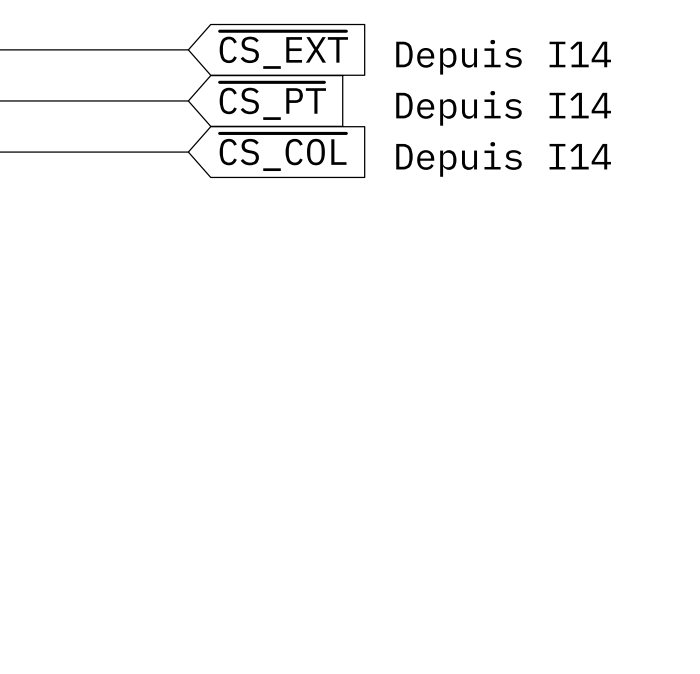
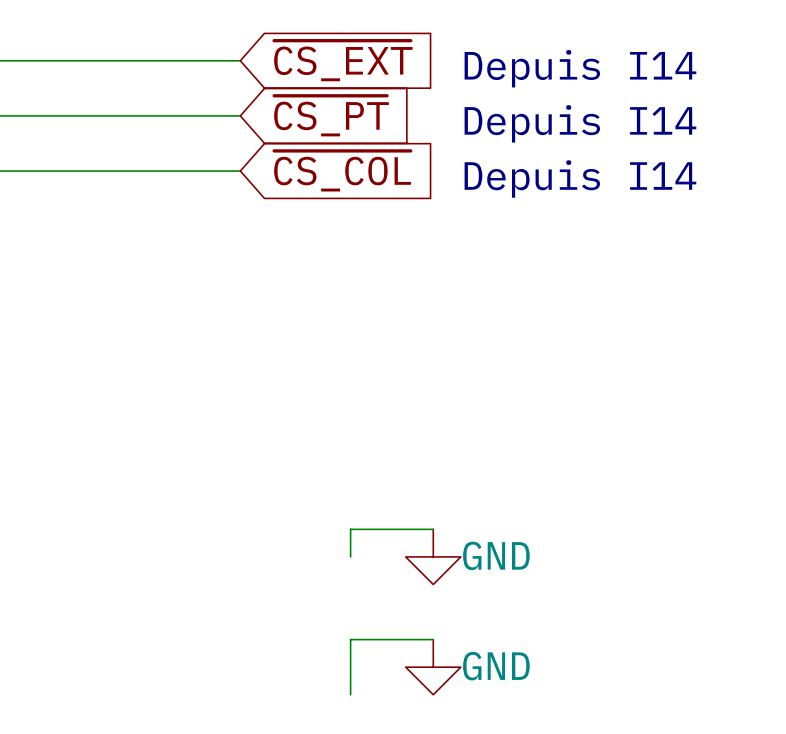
wire: none -> (433, 529) (350, 529) (350, 556)
power symbol: none -> GND (433, 556)
wire: none -> (433, 639) (350, 639) (350, 694)
power symbol: none -> GND (433, 667)

